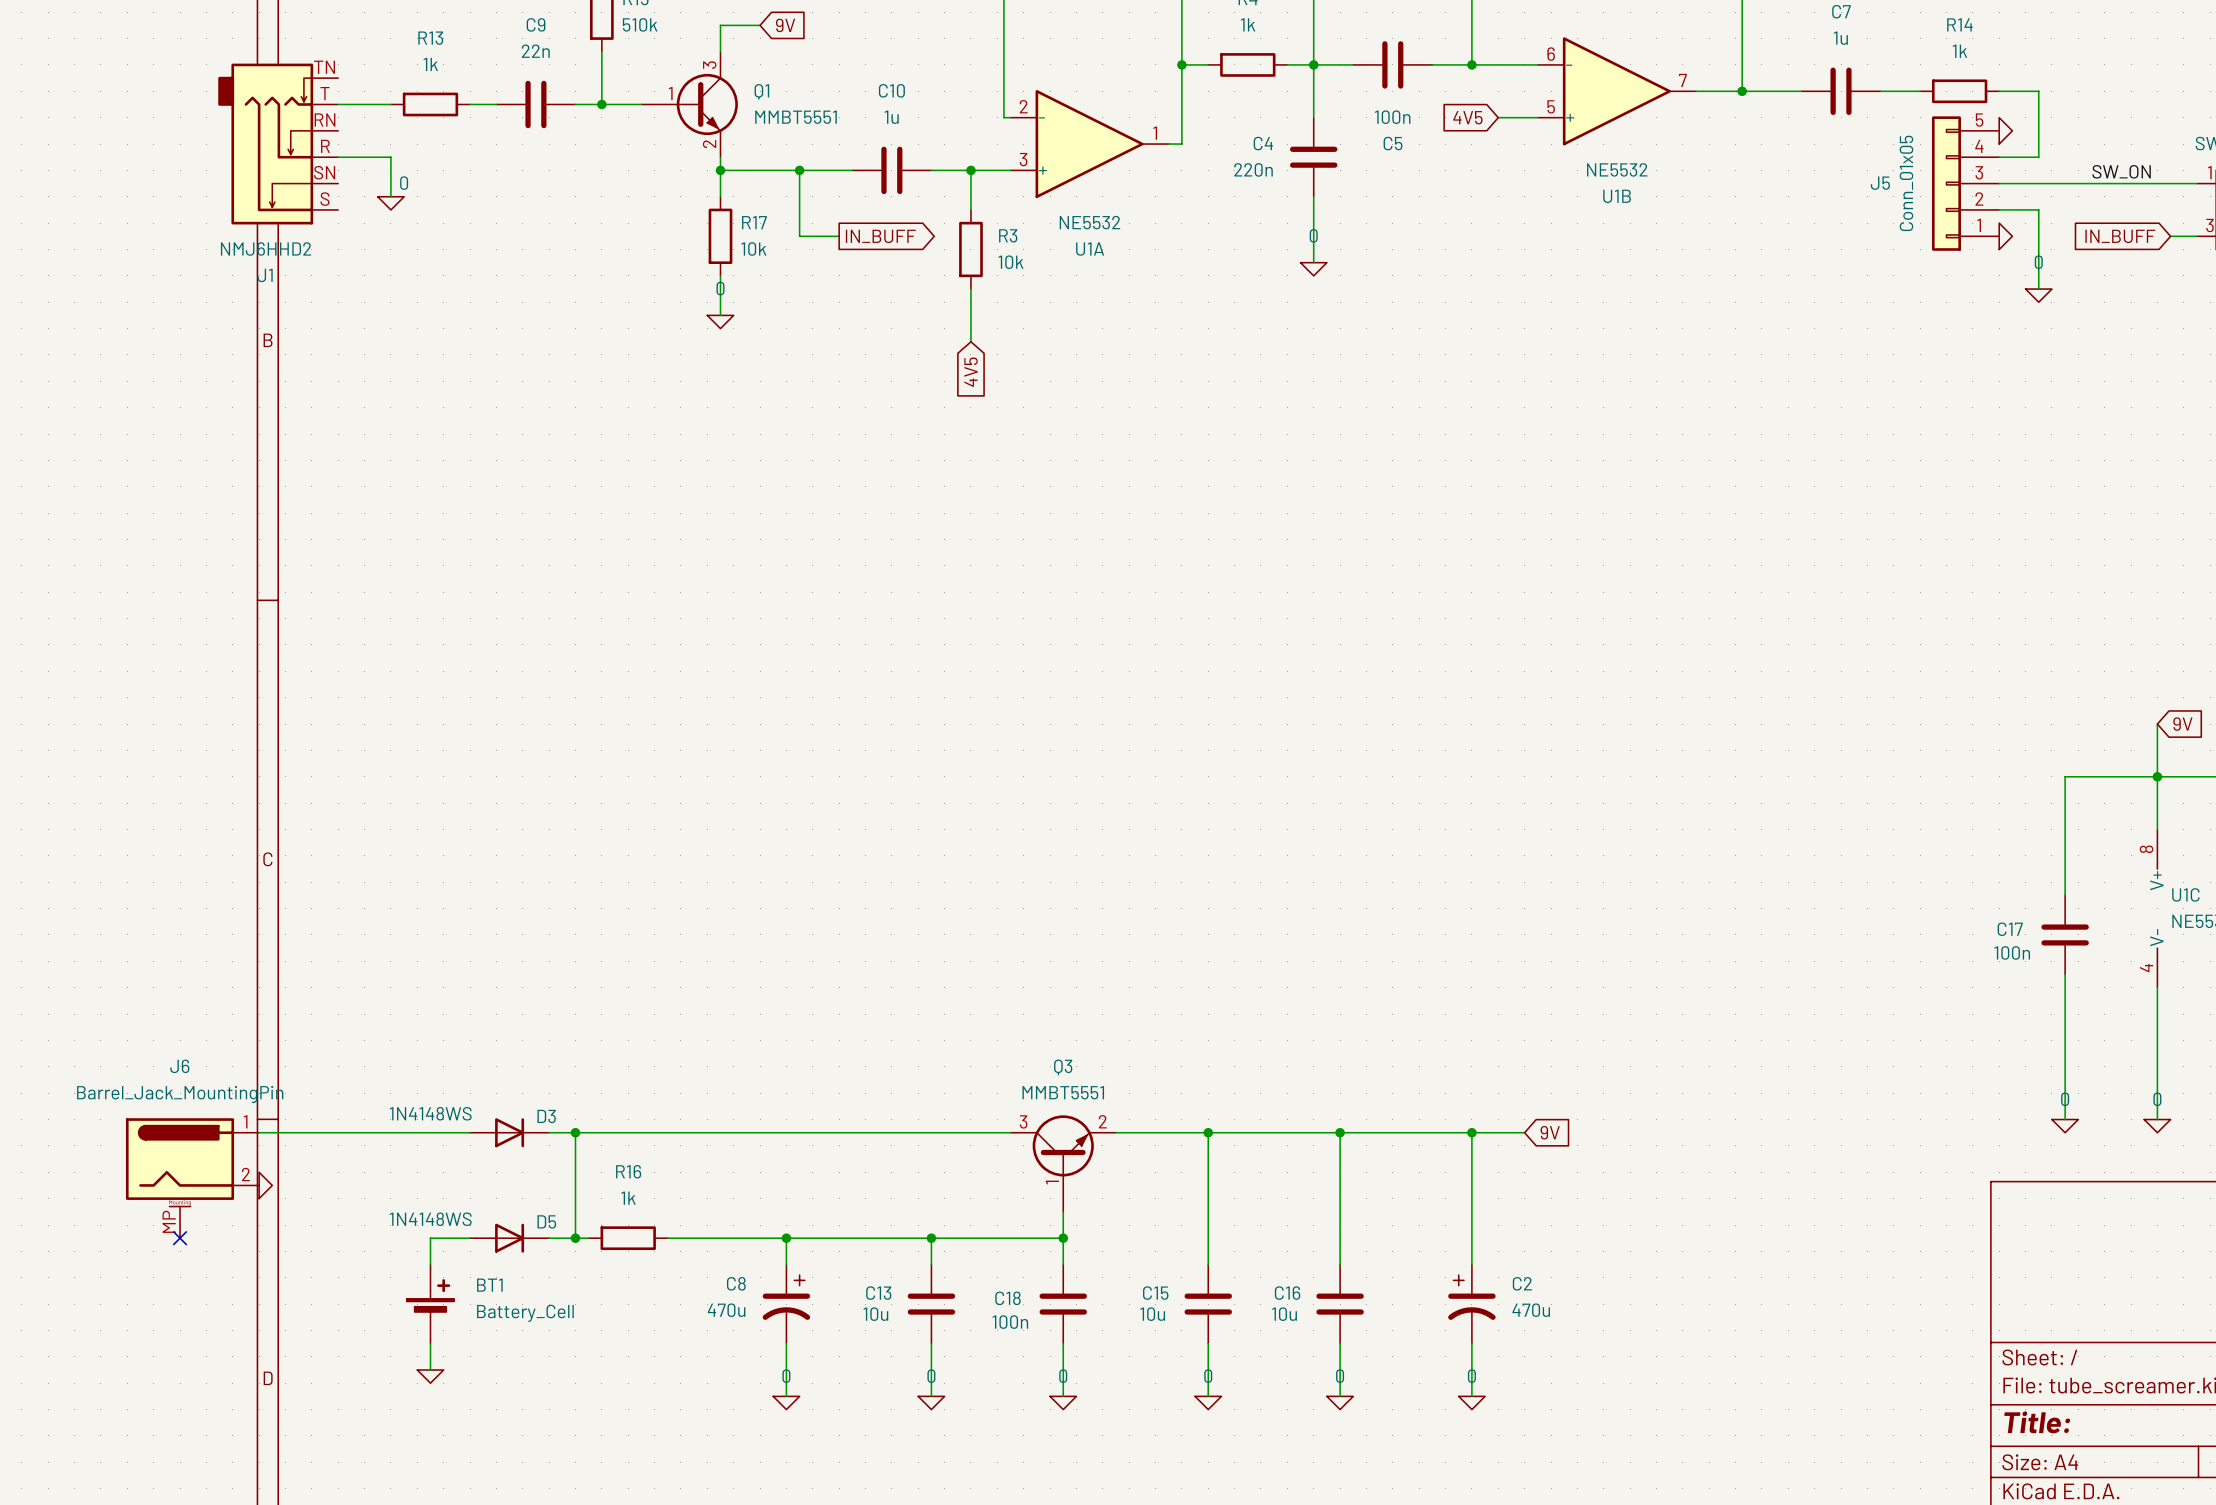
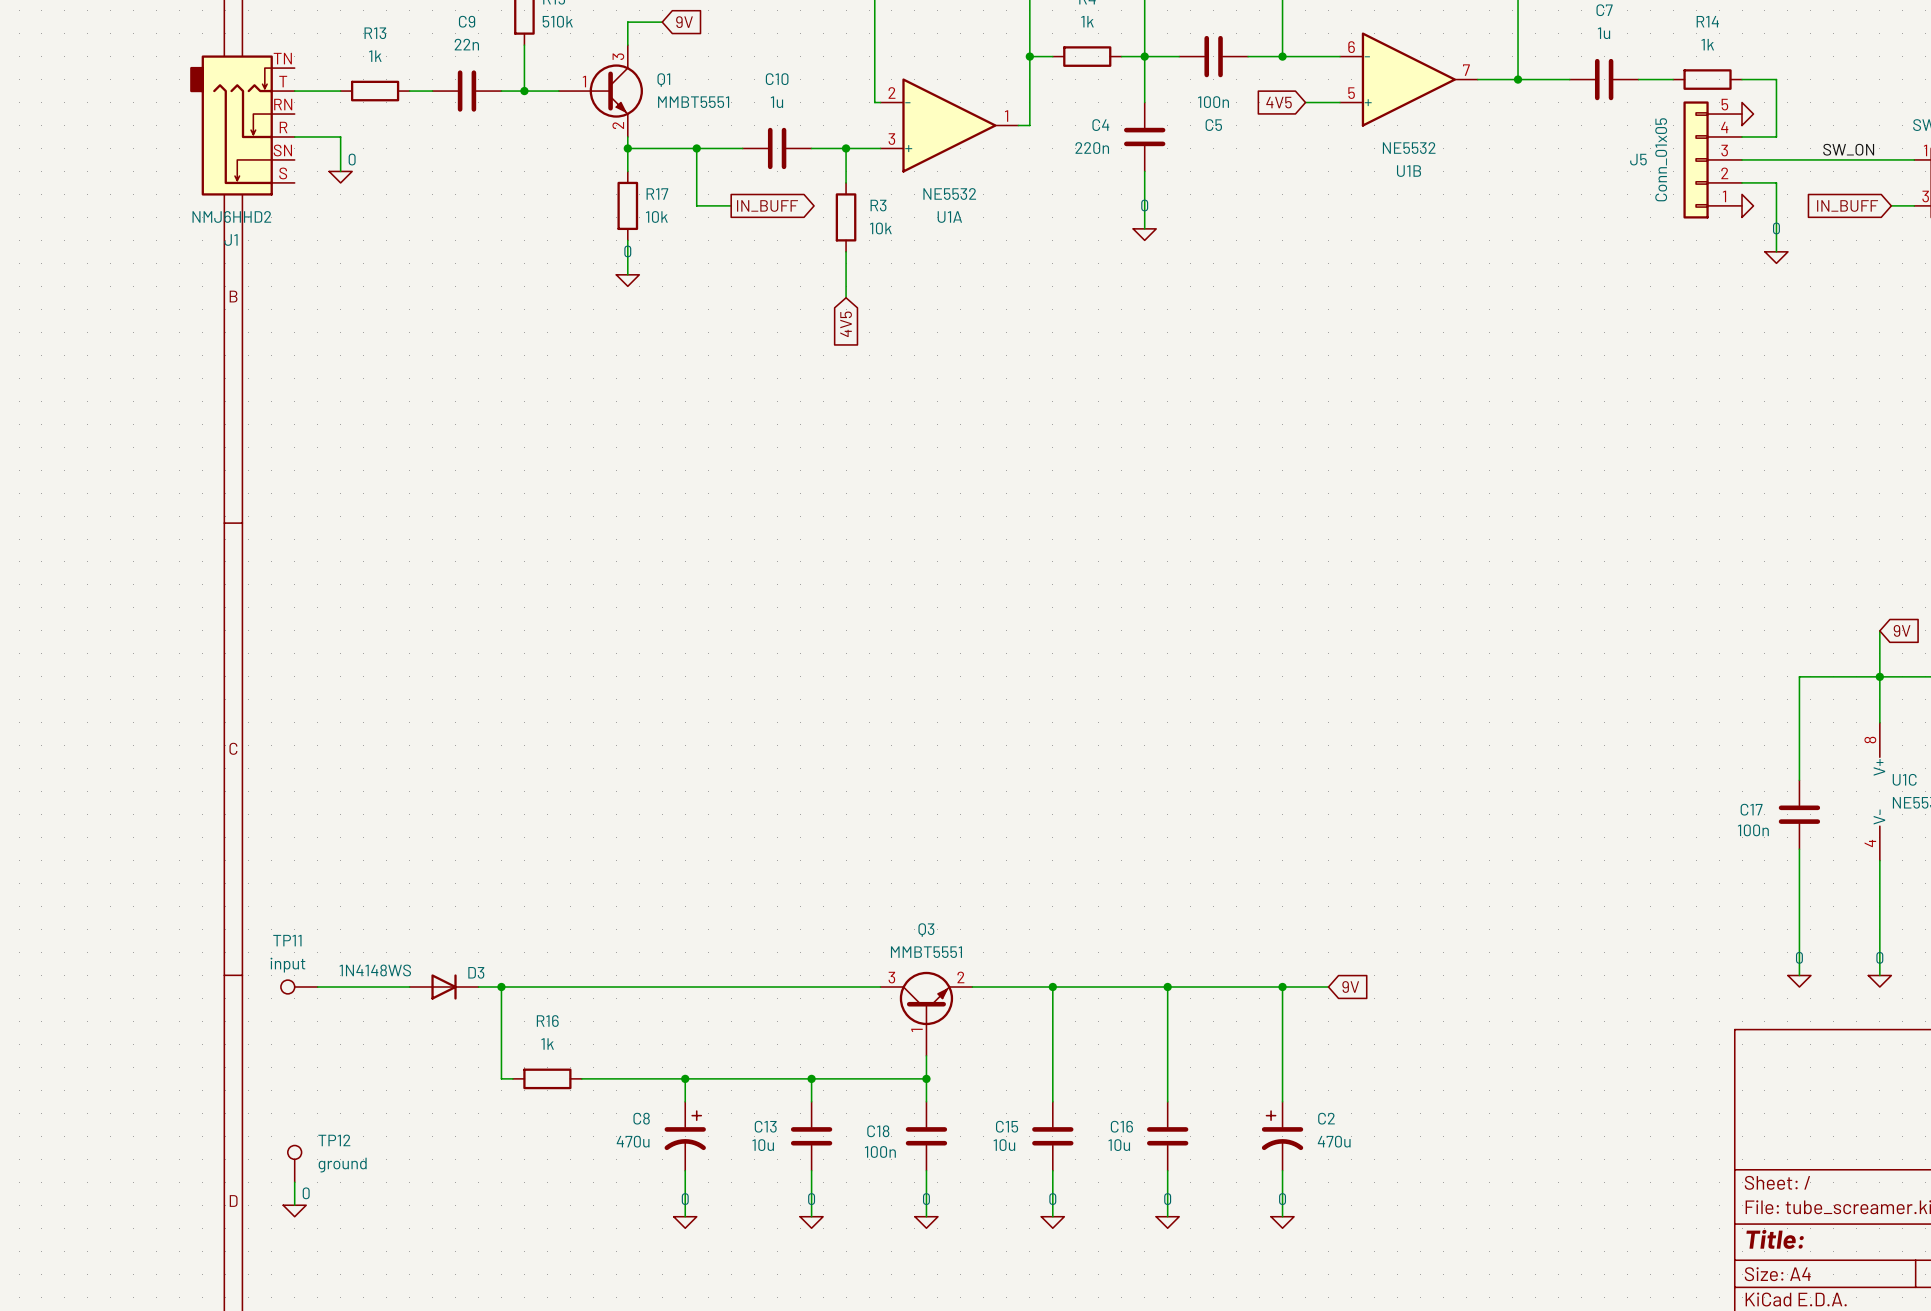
wire: (259, 1132) (364, 1132) -> none
TP11: none -> input (299, 986)
J6: Barrel_Jack_MountingPin (192, 1178) -> none
power symbol: (265, 1185) -> none
no-connect mark: (180, 1238) -> none
wire: (470, 1238) (430, 1238) (430, 1264) -> none
D5: 1N4148WS (509, 1238) -> none
wire: (549, 1238) (575, 1238) -> none
junction: (575, 1238) -> none
BT1: Battery_Cell (430, 1304) -> none
TP12: none -> ground (294, 1163)
wire: (430, 1343) (430, 1370) -> (294, 1182) (294, 1205)
power symbol: (430, 1376) -> none
power symbol: none -> 0 (294, 1210)

